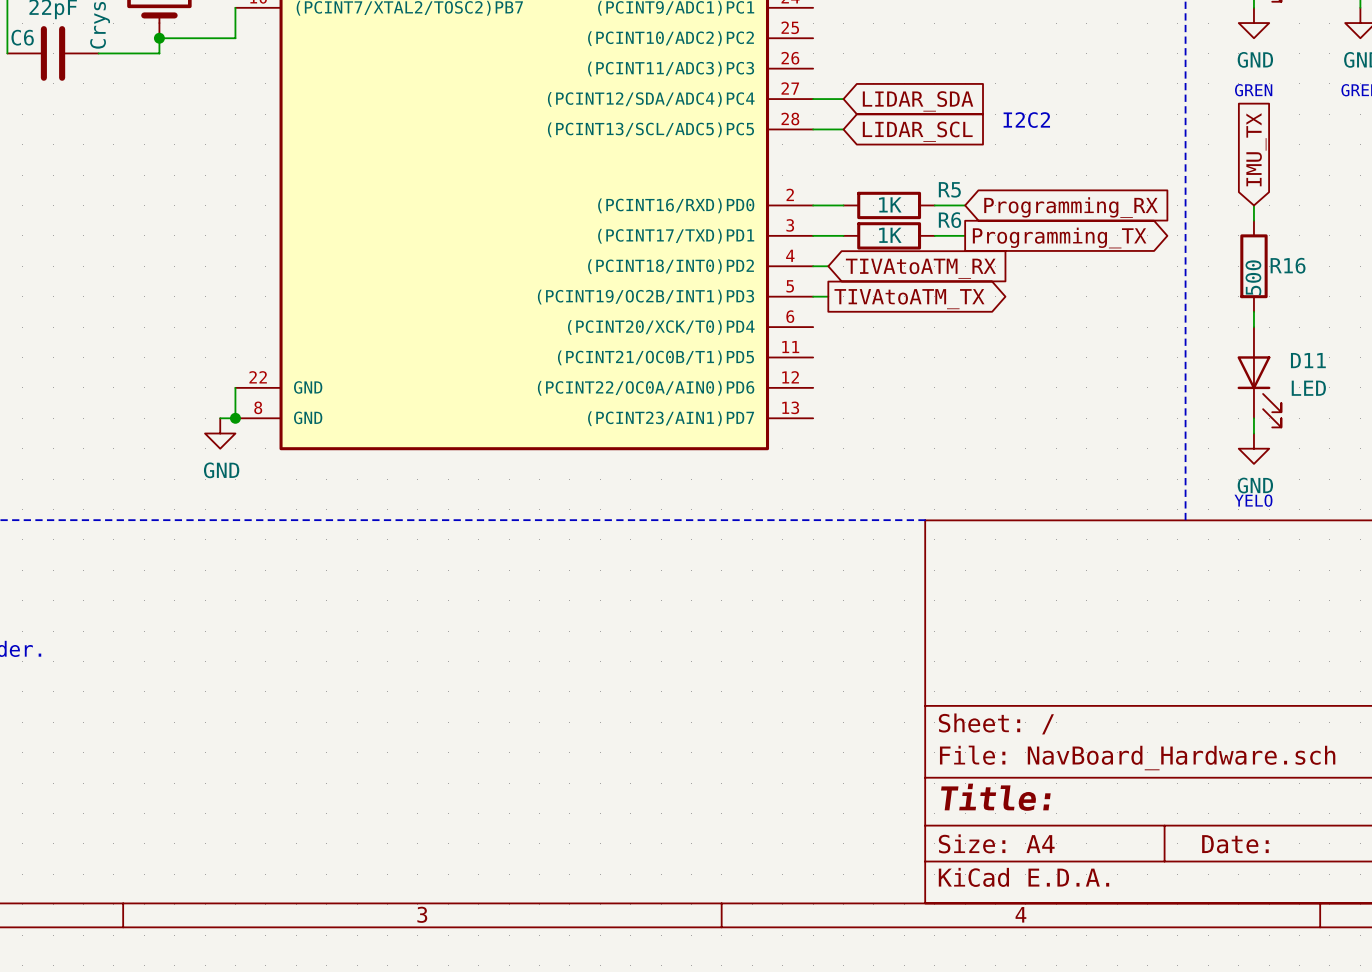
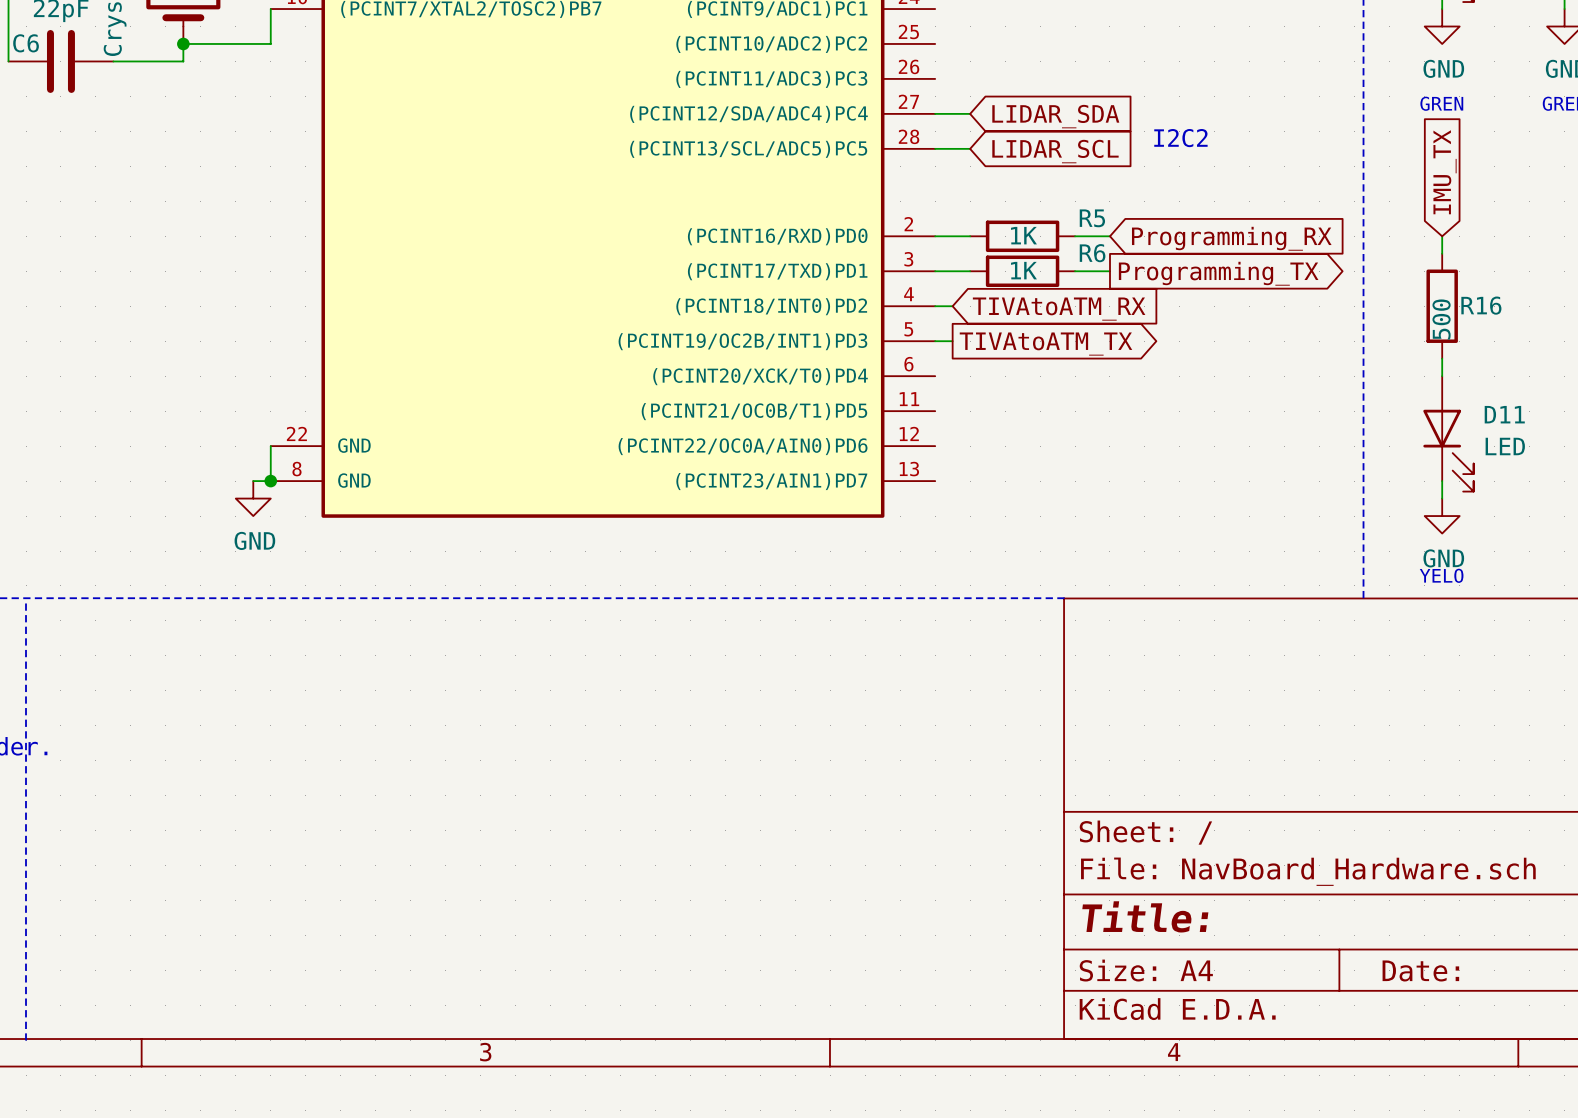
line: none -> (26, 603) (26, 1040)

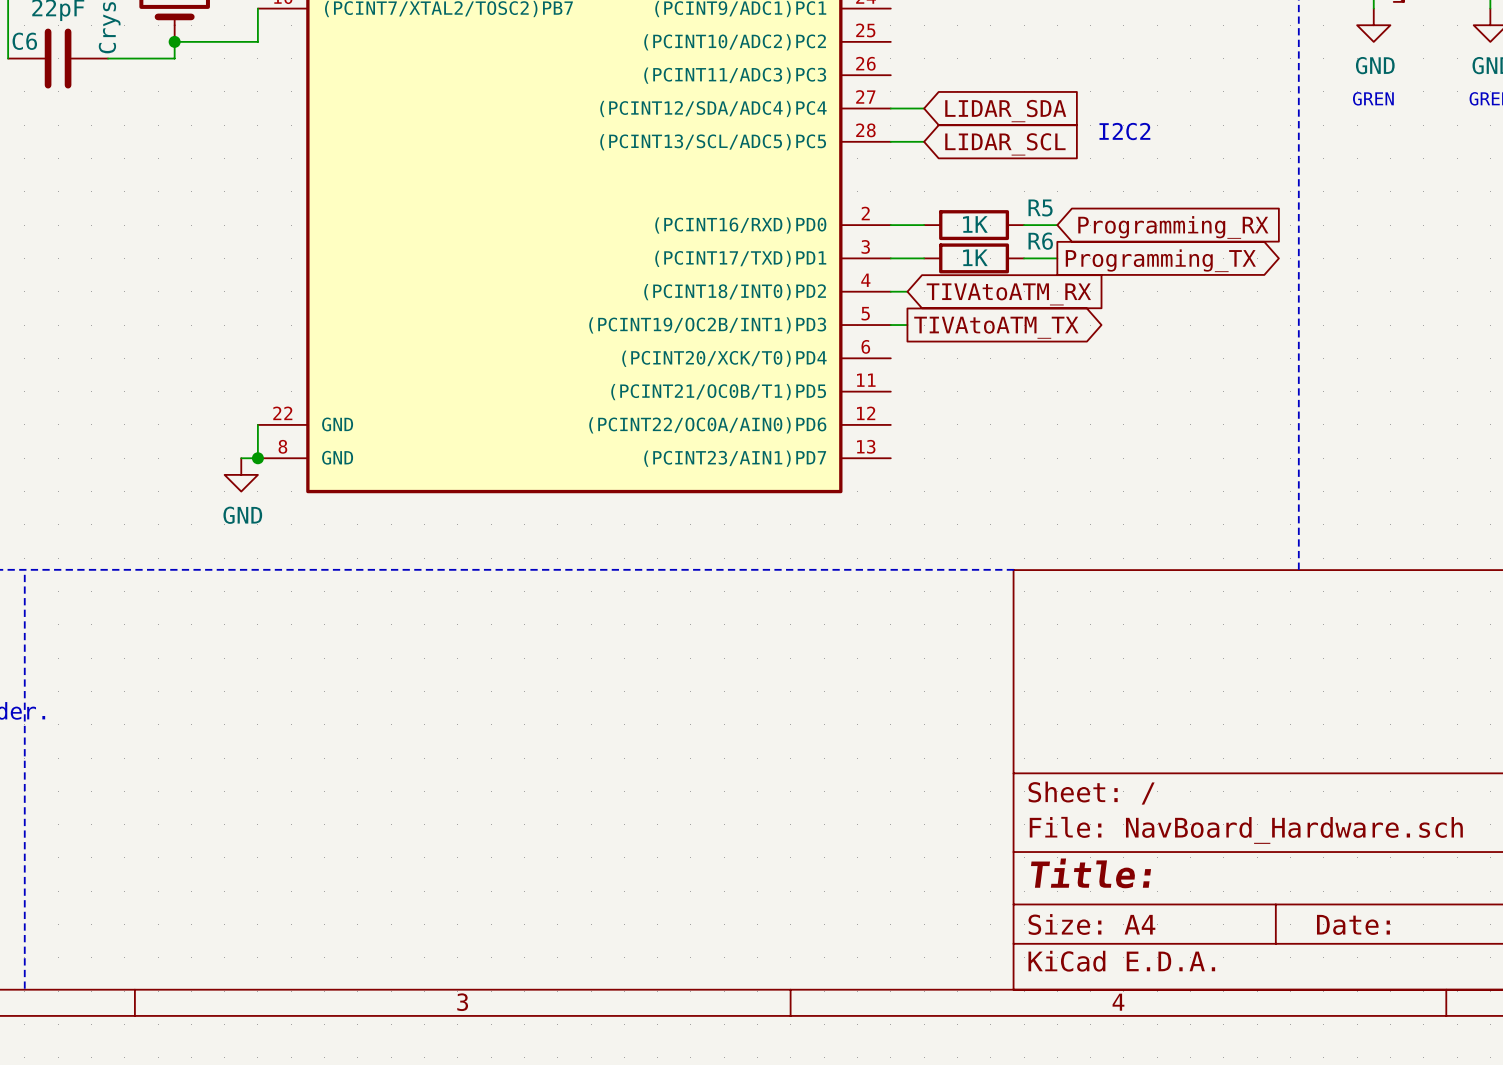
global label: IMU_TX (1445, 172) -> none
wire: (1442, 236) (1442, 253) -> none
R16: 500 (1442, 306) -> none
wire: (1442, 358) (1442, 376) -> none
D11: LED (1448, 433) -> none
wire: (1442, 481) (1442, 498) -> none
power symbol: GND (1442, 516) -> none
text: YELO (1441, 575) -> none

